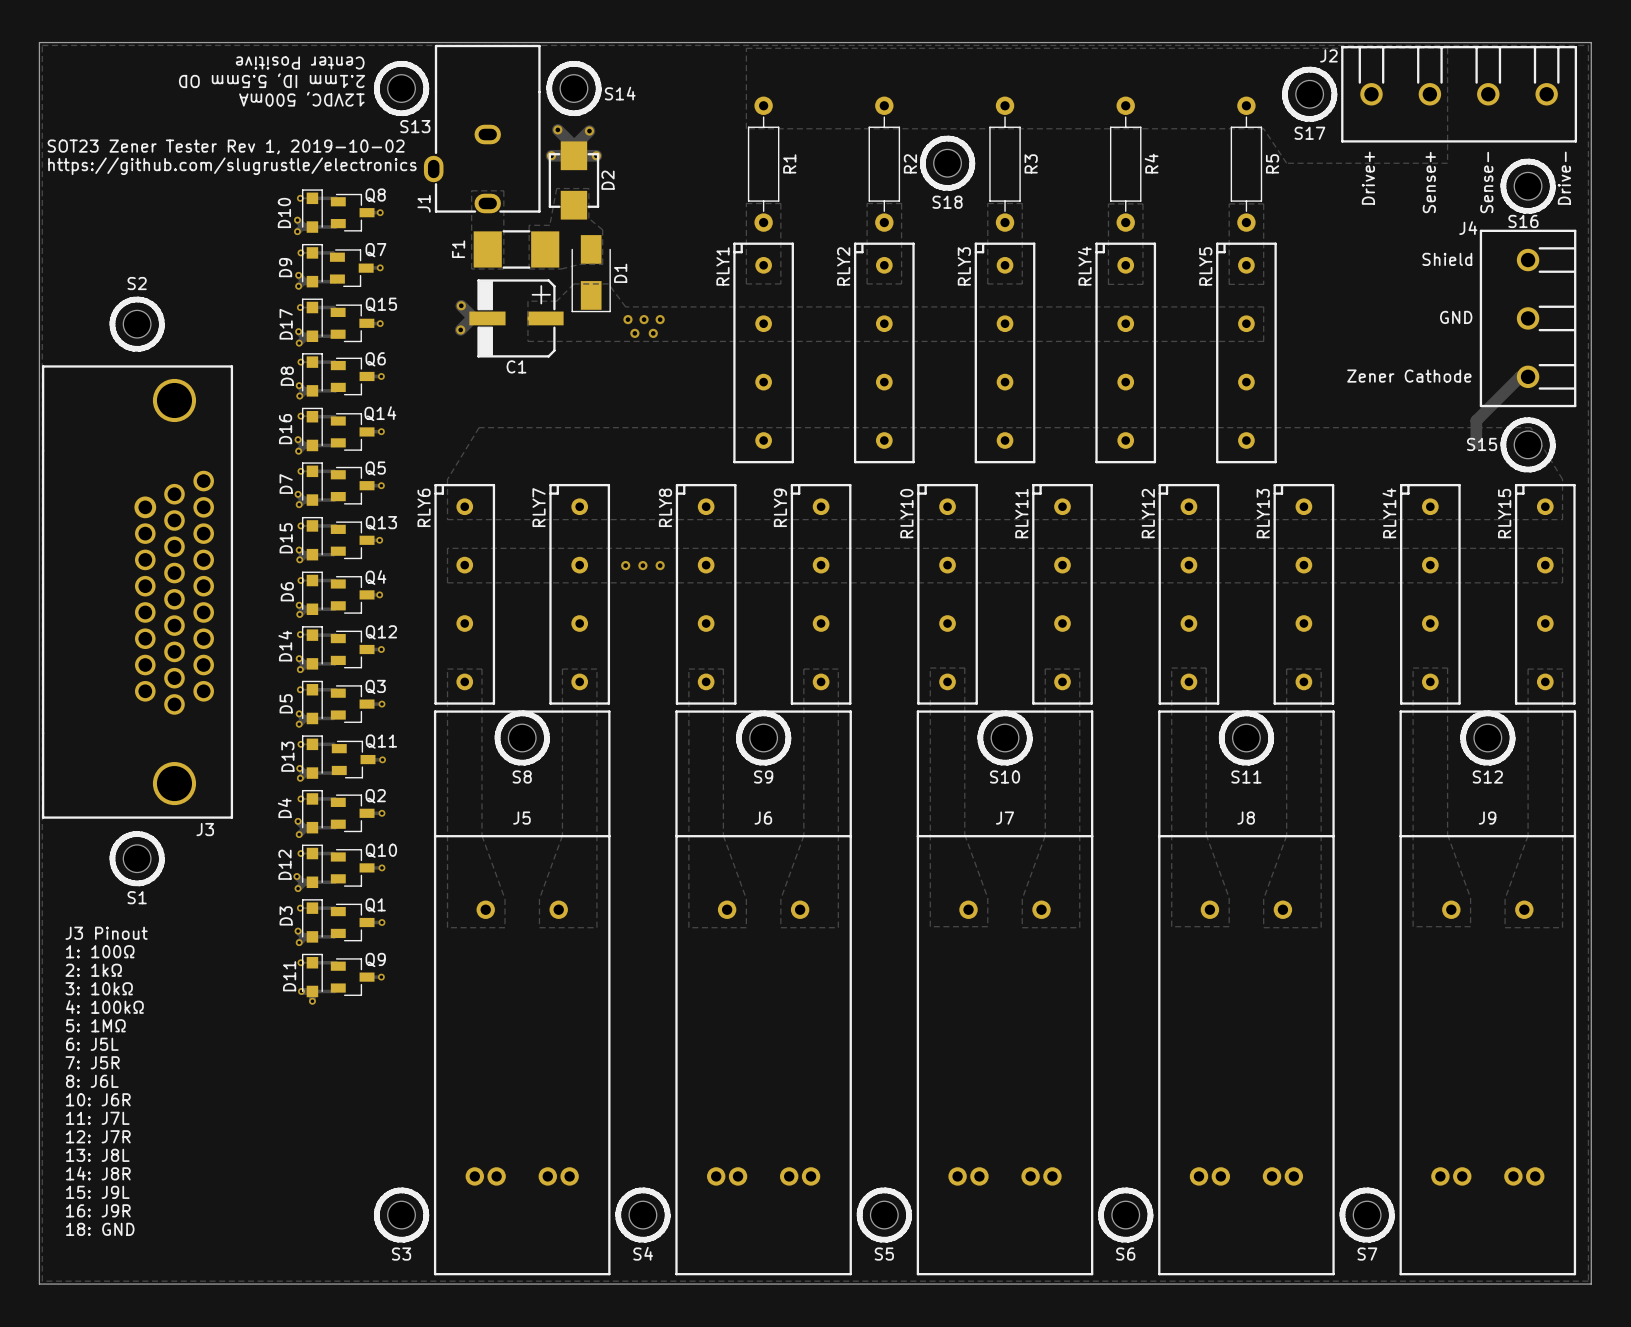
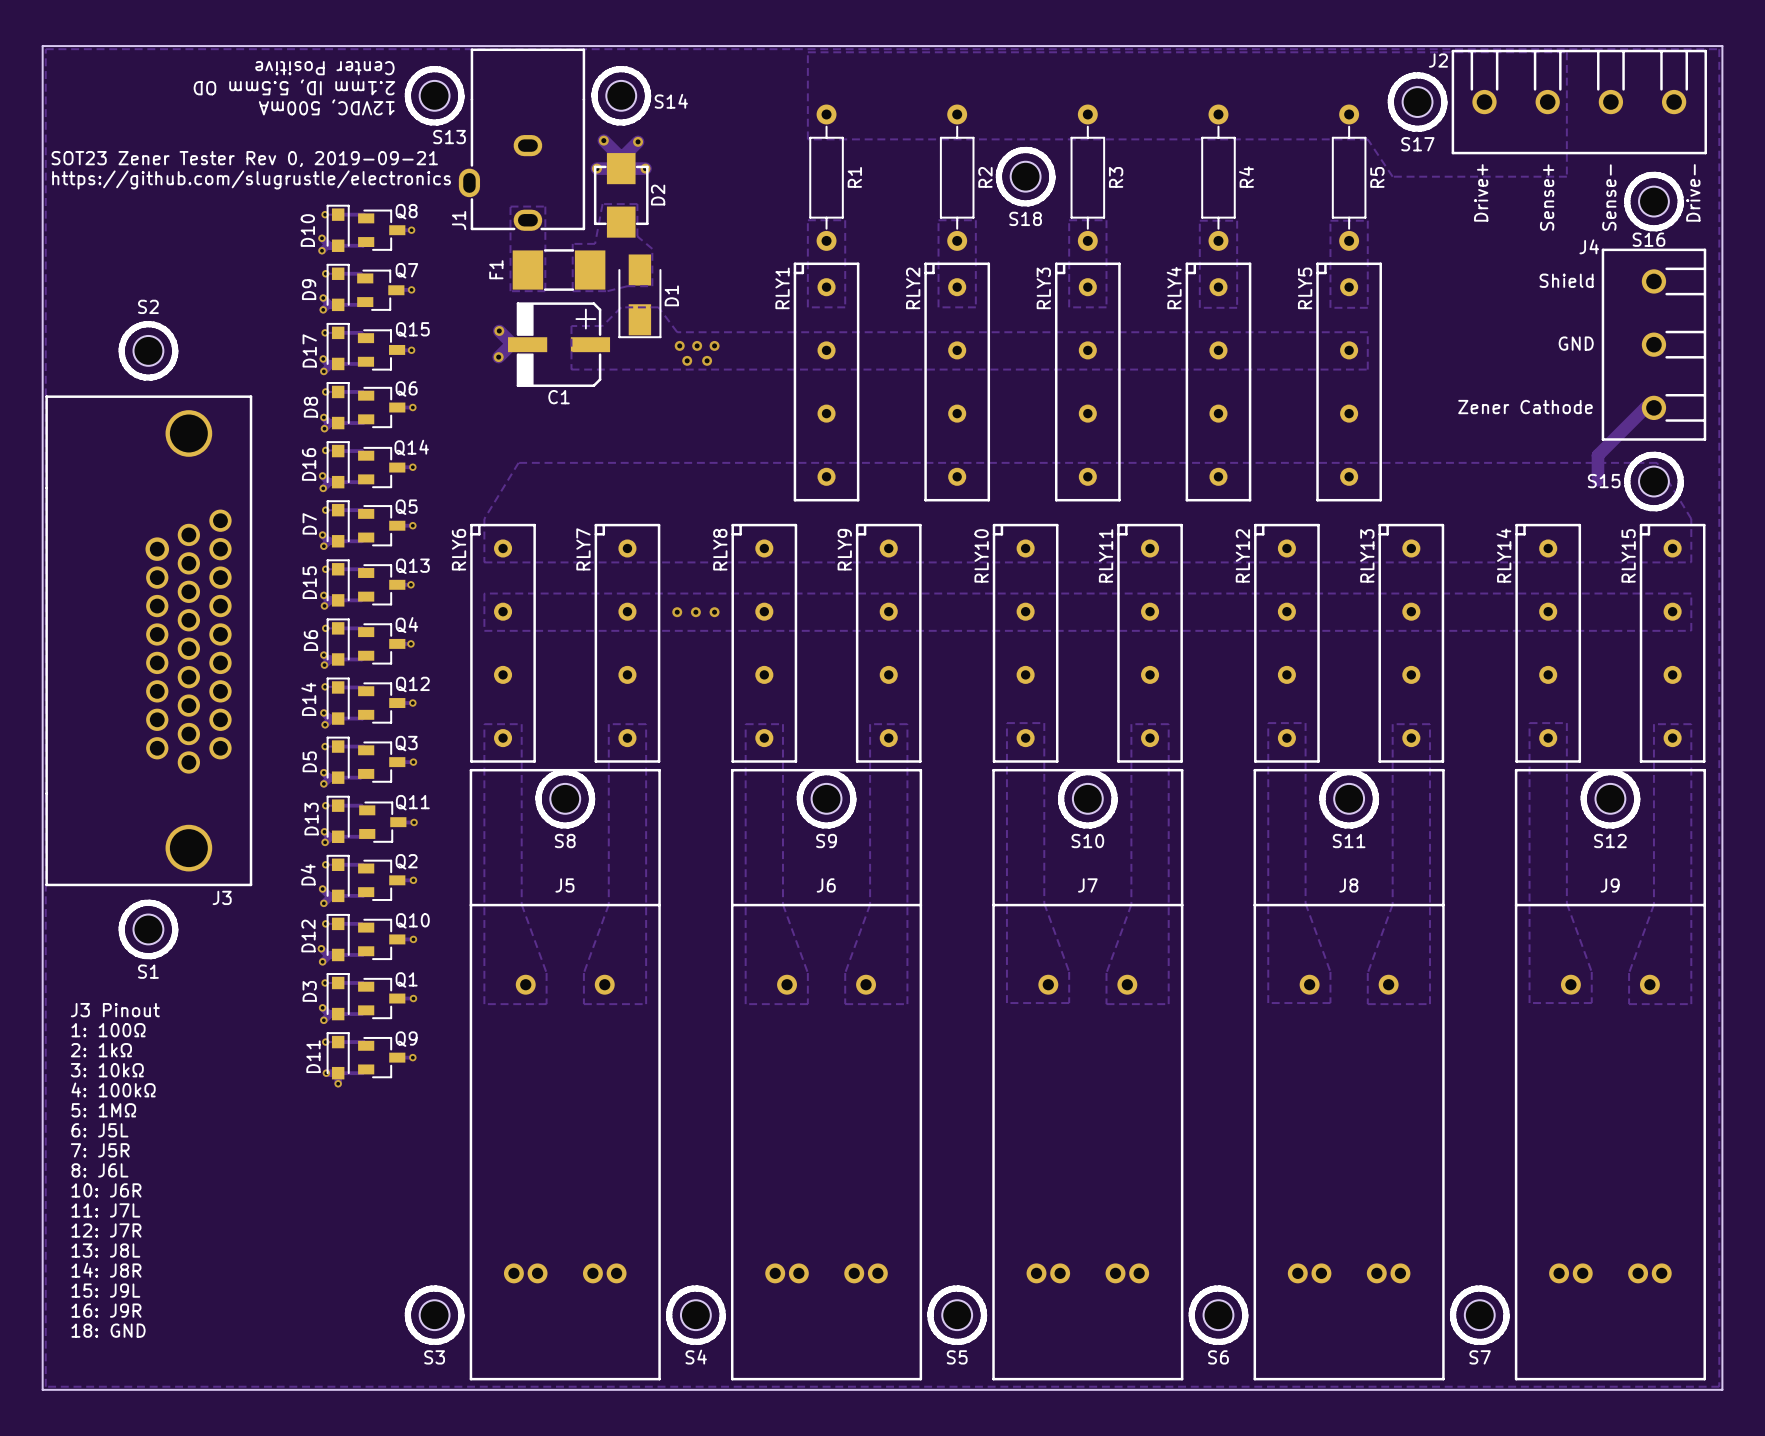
text: SOT23 Zener Tester Rev 1, 2019-10-02 (226, 146) -> SOT23 Zener Tester Rev 0, 2019-09-21 (244, 159)

